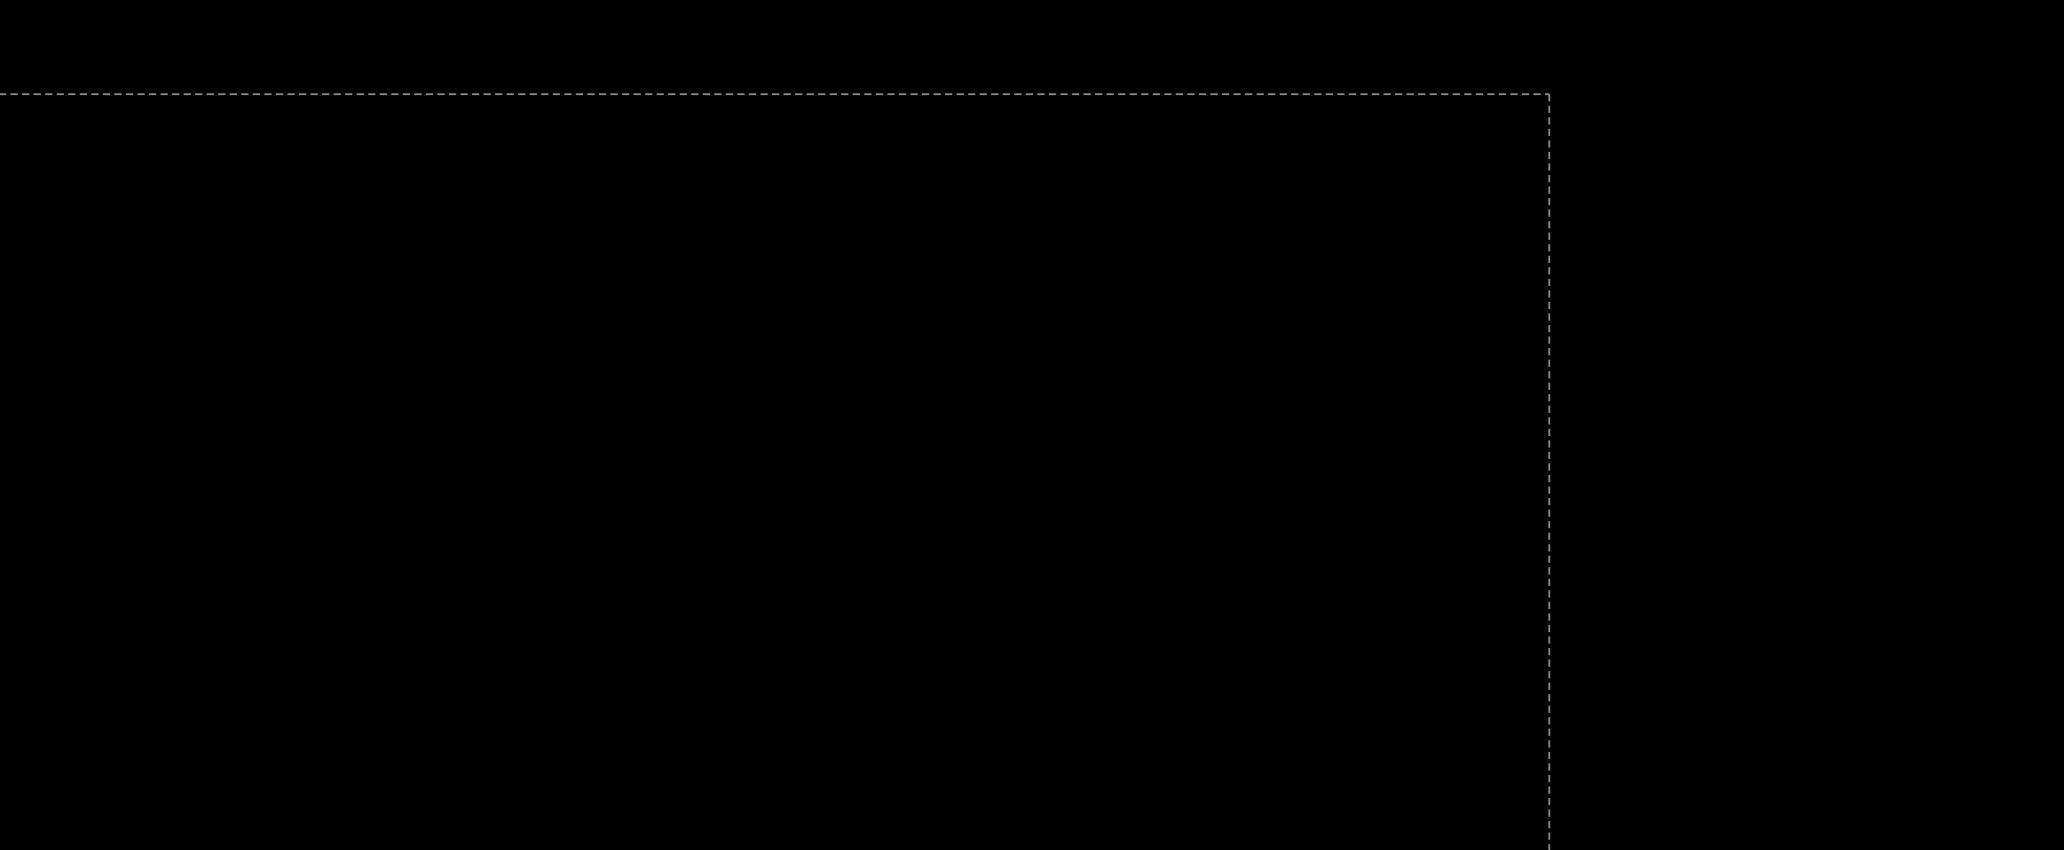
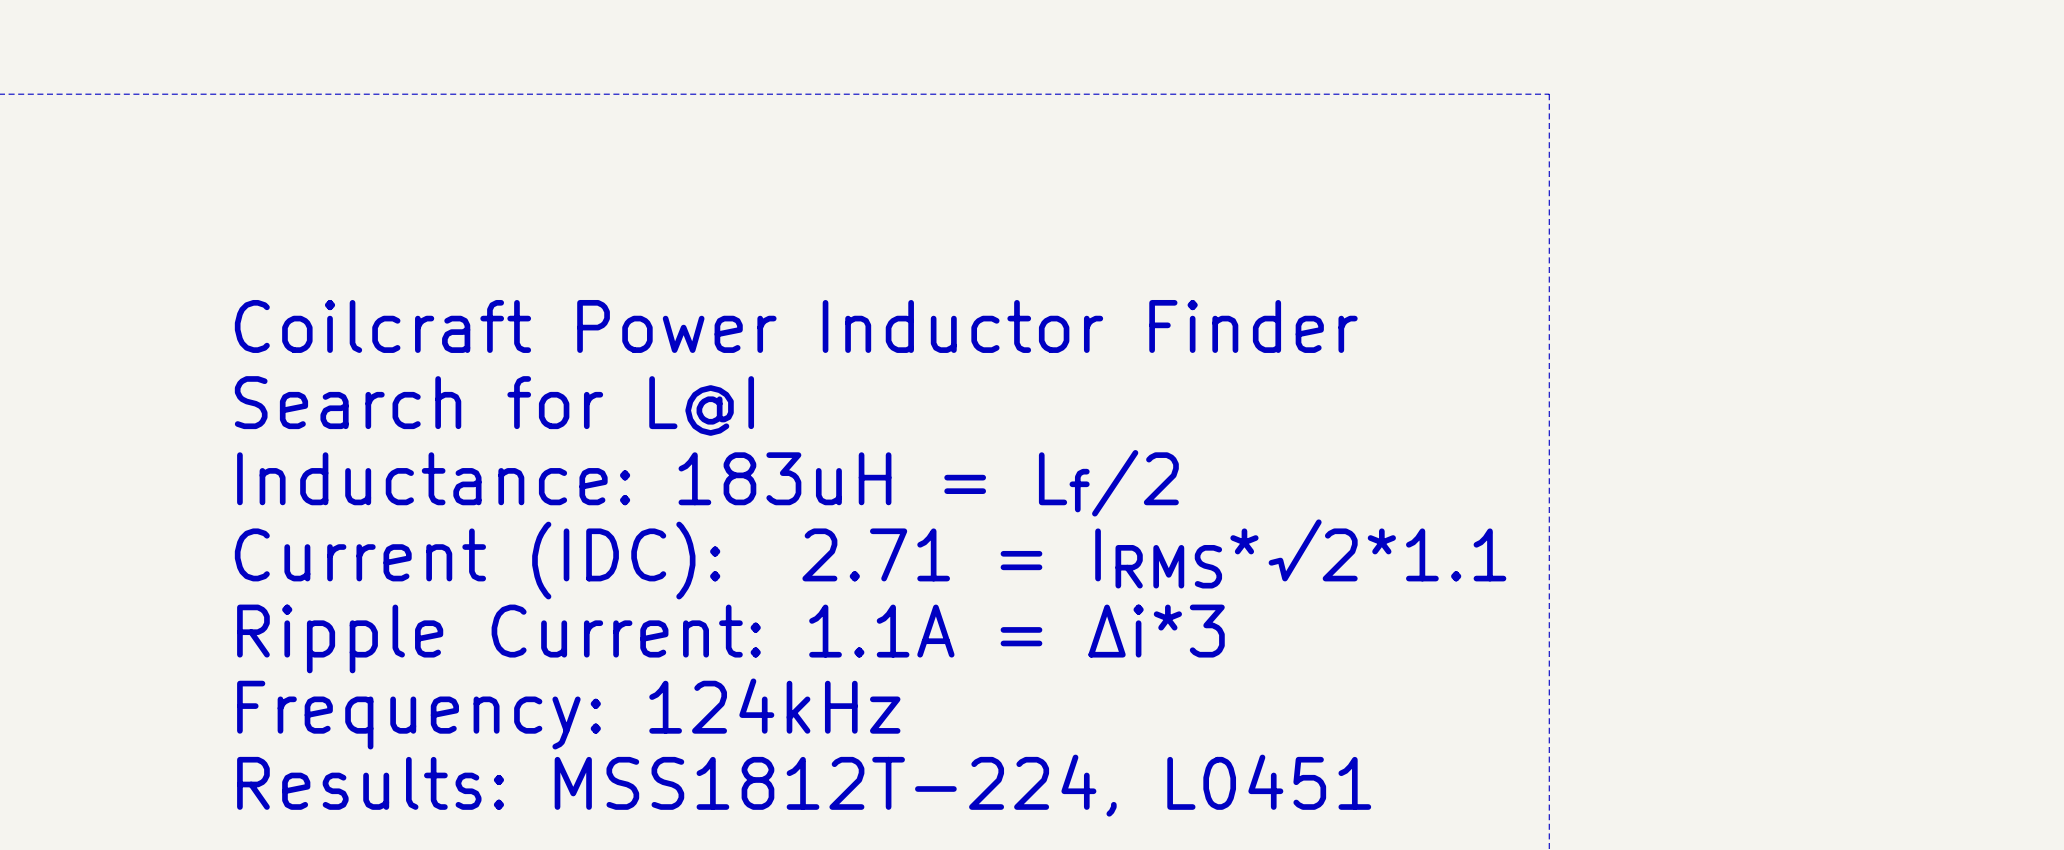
text: none -> Coilcraft Power Inductor Finder (796, 326)
text: none -> Search for L@I (494, 405)
text: none -> Inductance: 183uH = Lf/2 (707, 483)
text: none -> Current (IDC): 2.71 = IRMS*√2*1.1 (870, 559)
text: none -> Ripple Current: 1.1A = Δi*3 (730, 638)
text: none -> Frequency: 124kHz (568, 713)
text: none -> Results: MSS1812T-224, L0451 (804, 785)

